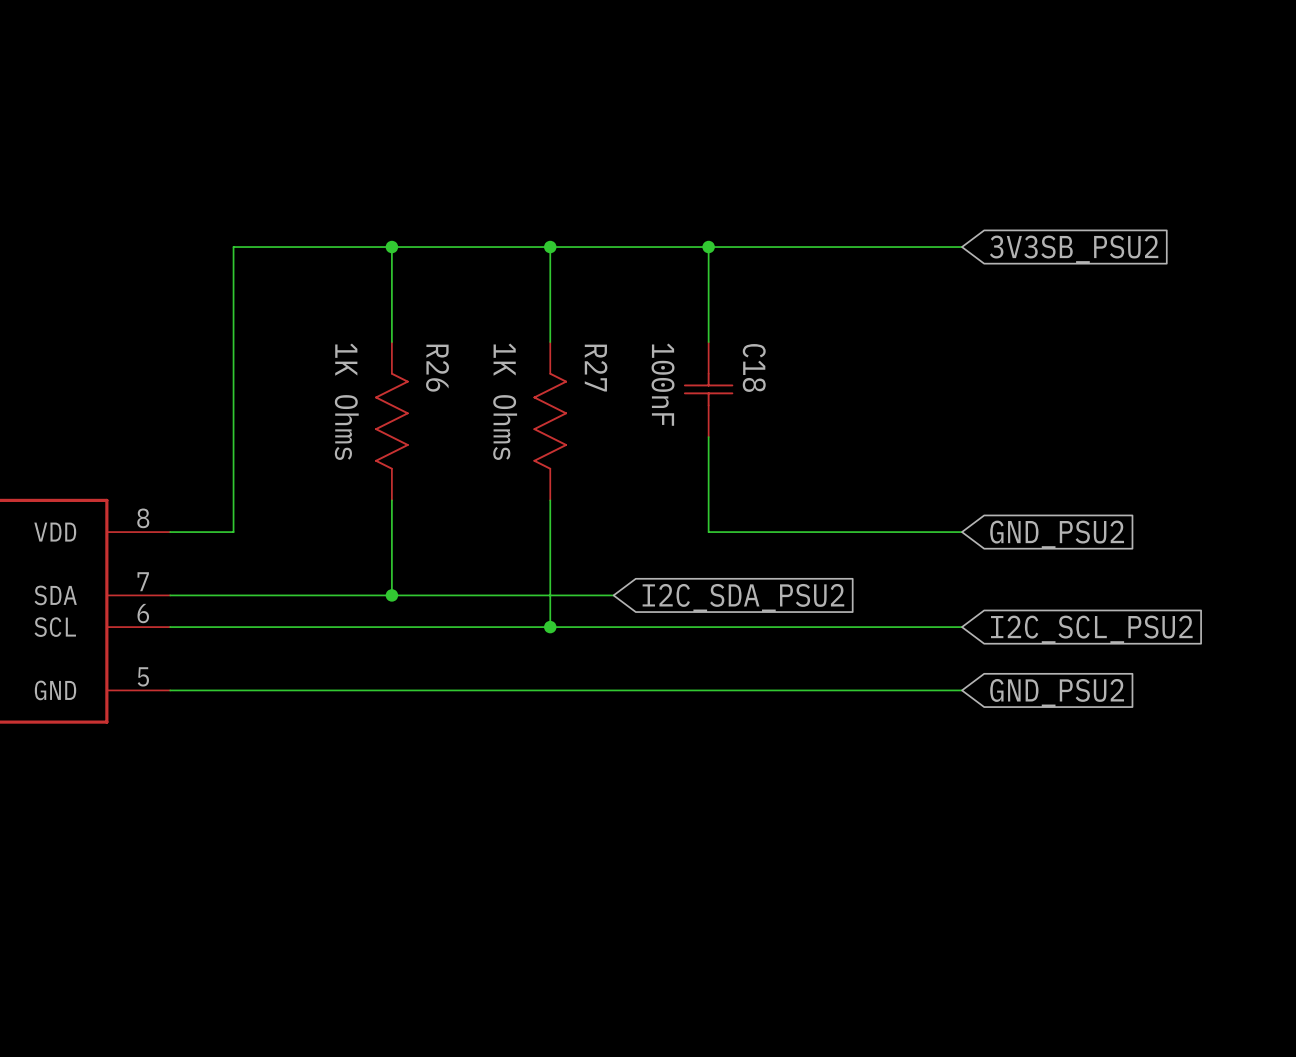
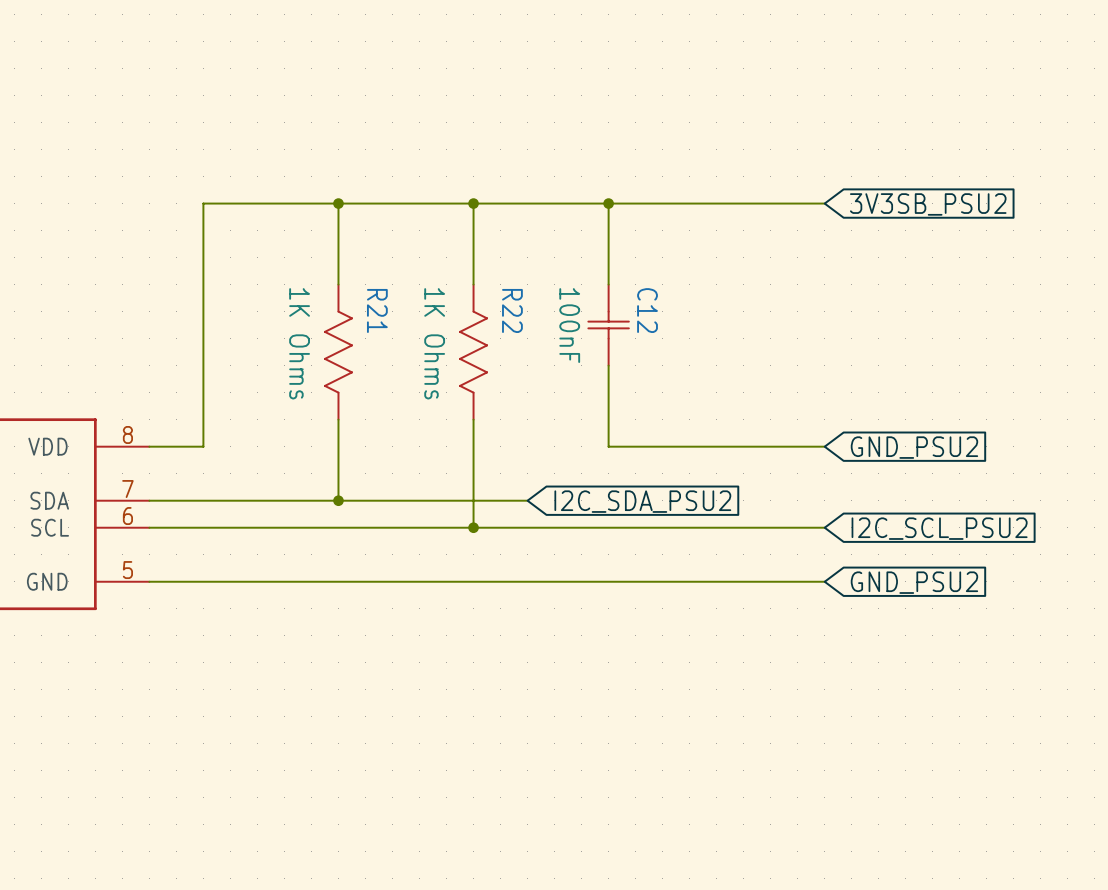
C18 name: C18 (754, 367) -> C12 (647, 310)
R26 name: R26 (437, 368) -> R21 (377, 310)
R27 name: R27 (596, 368) -> R22 (512, 310)

